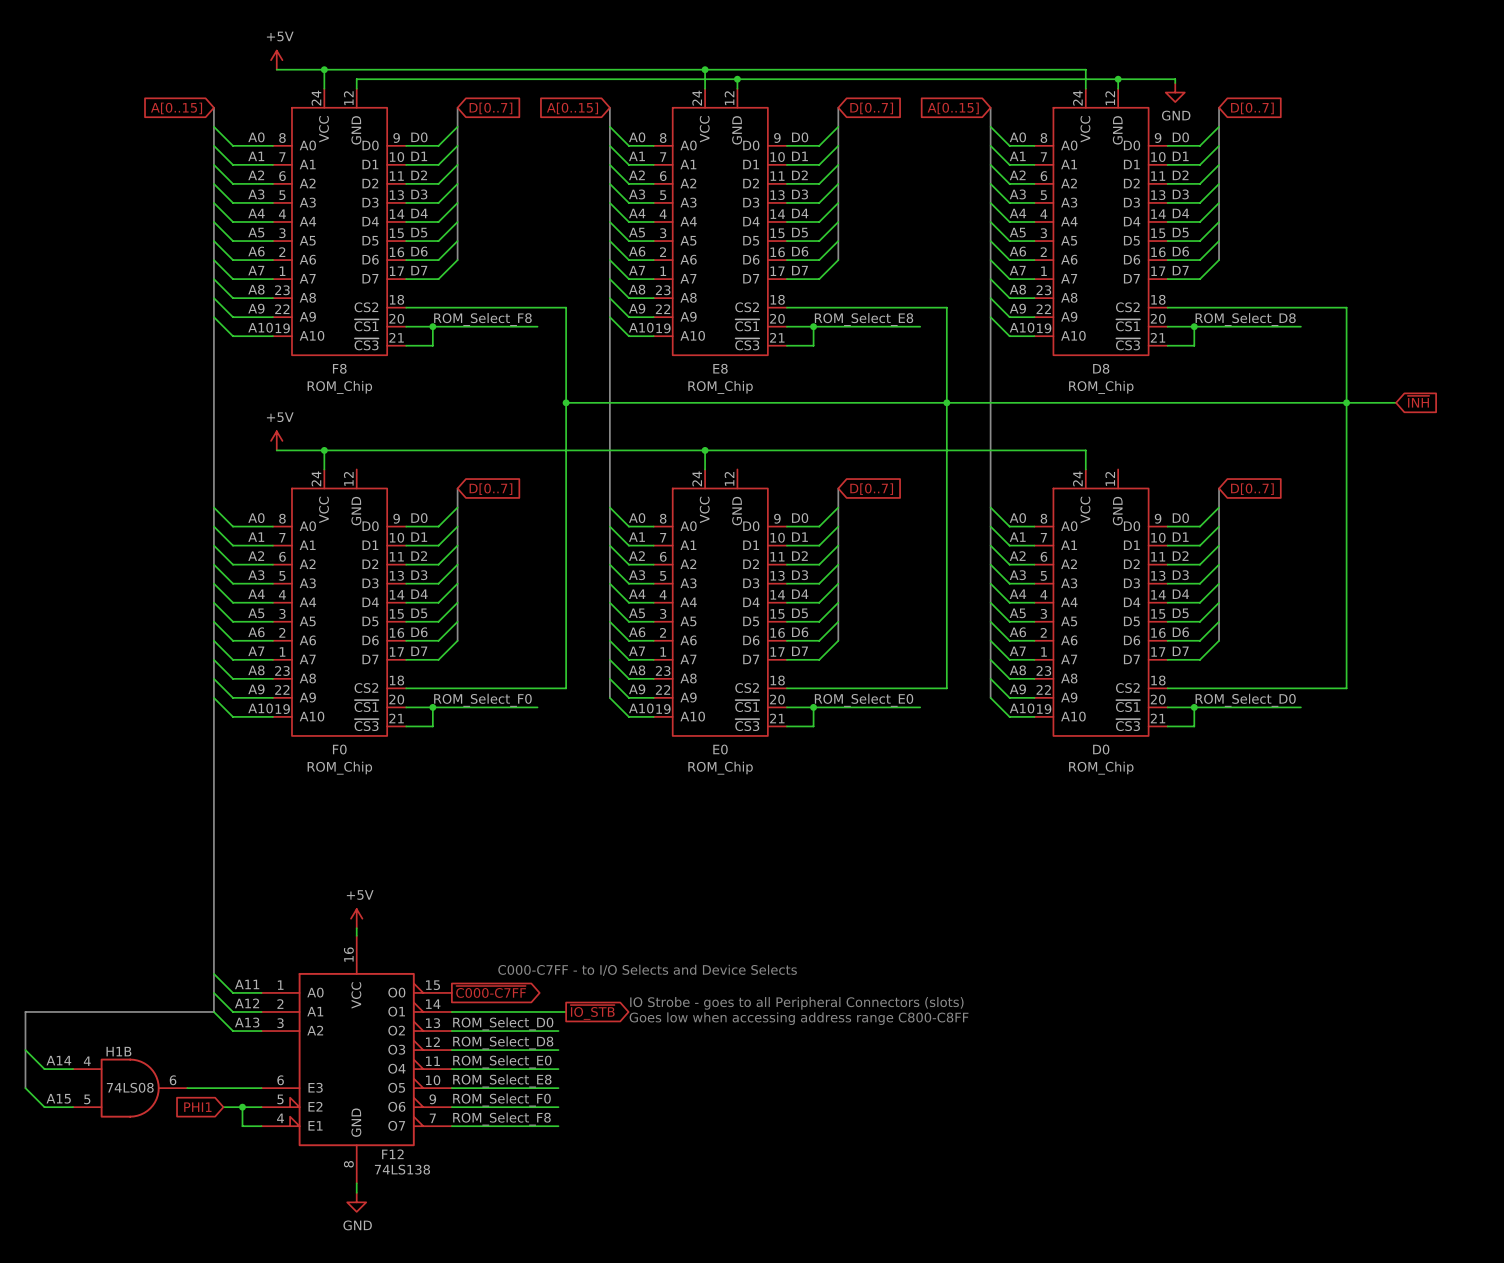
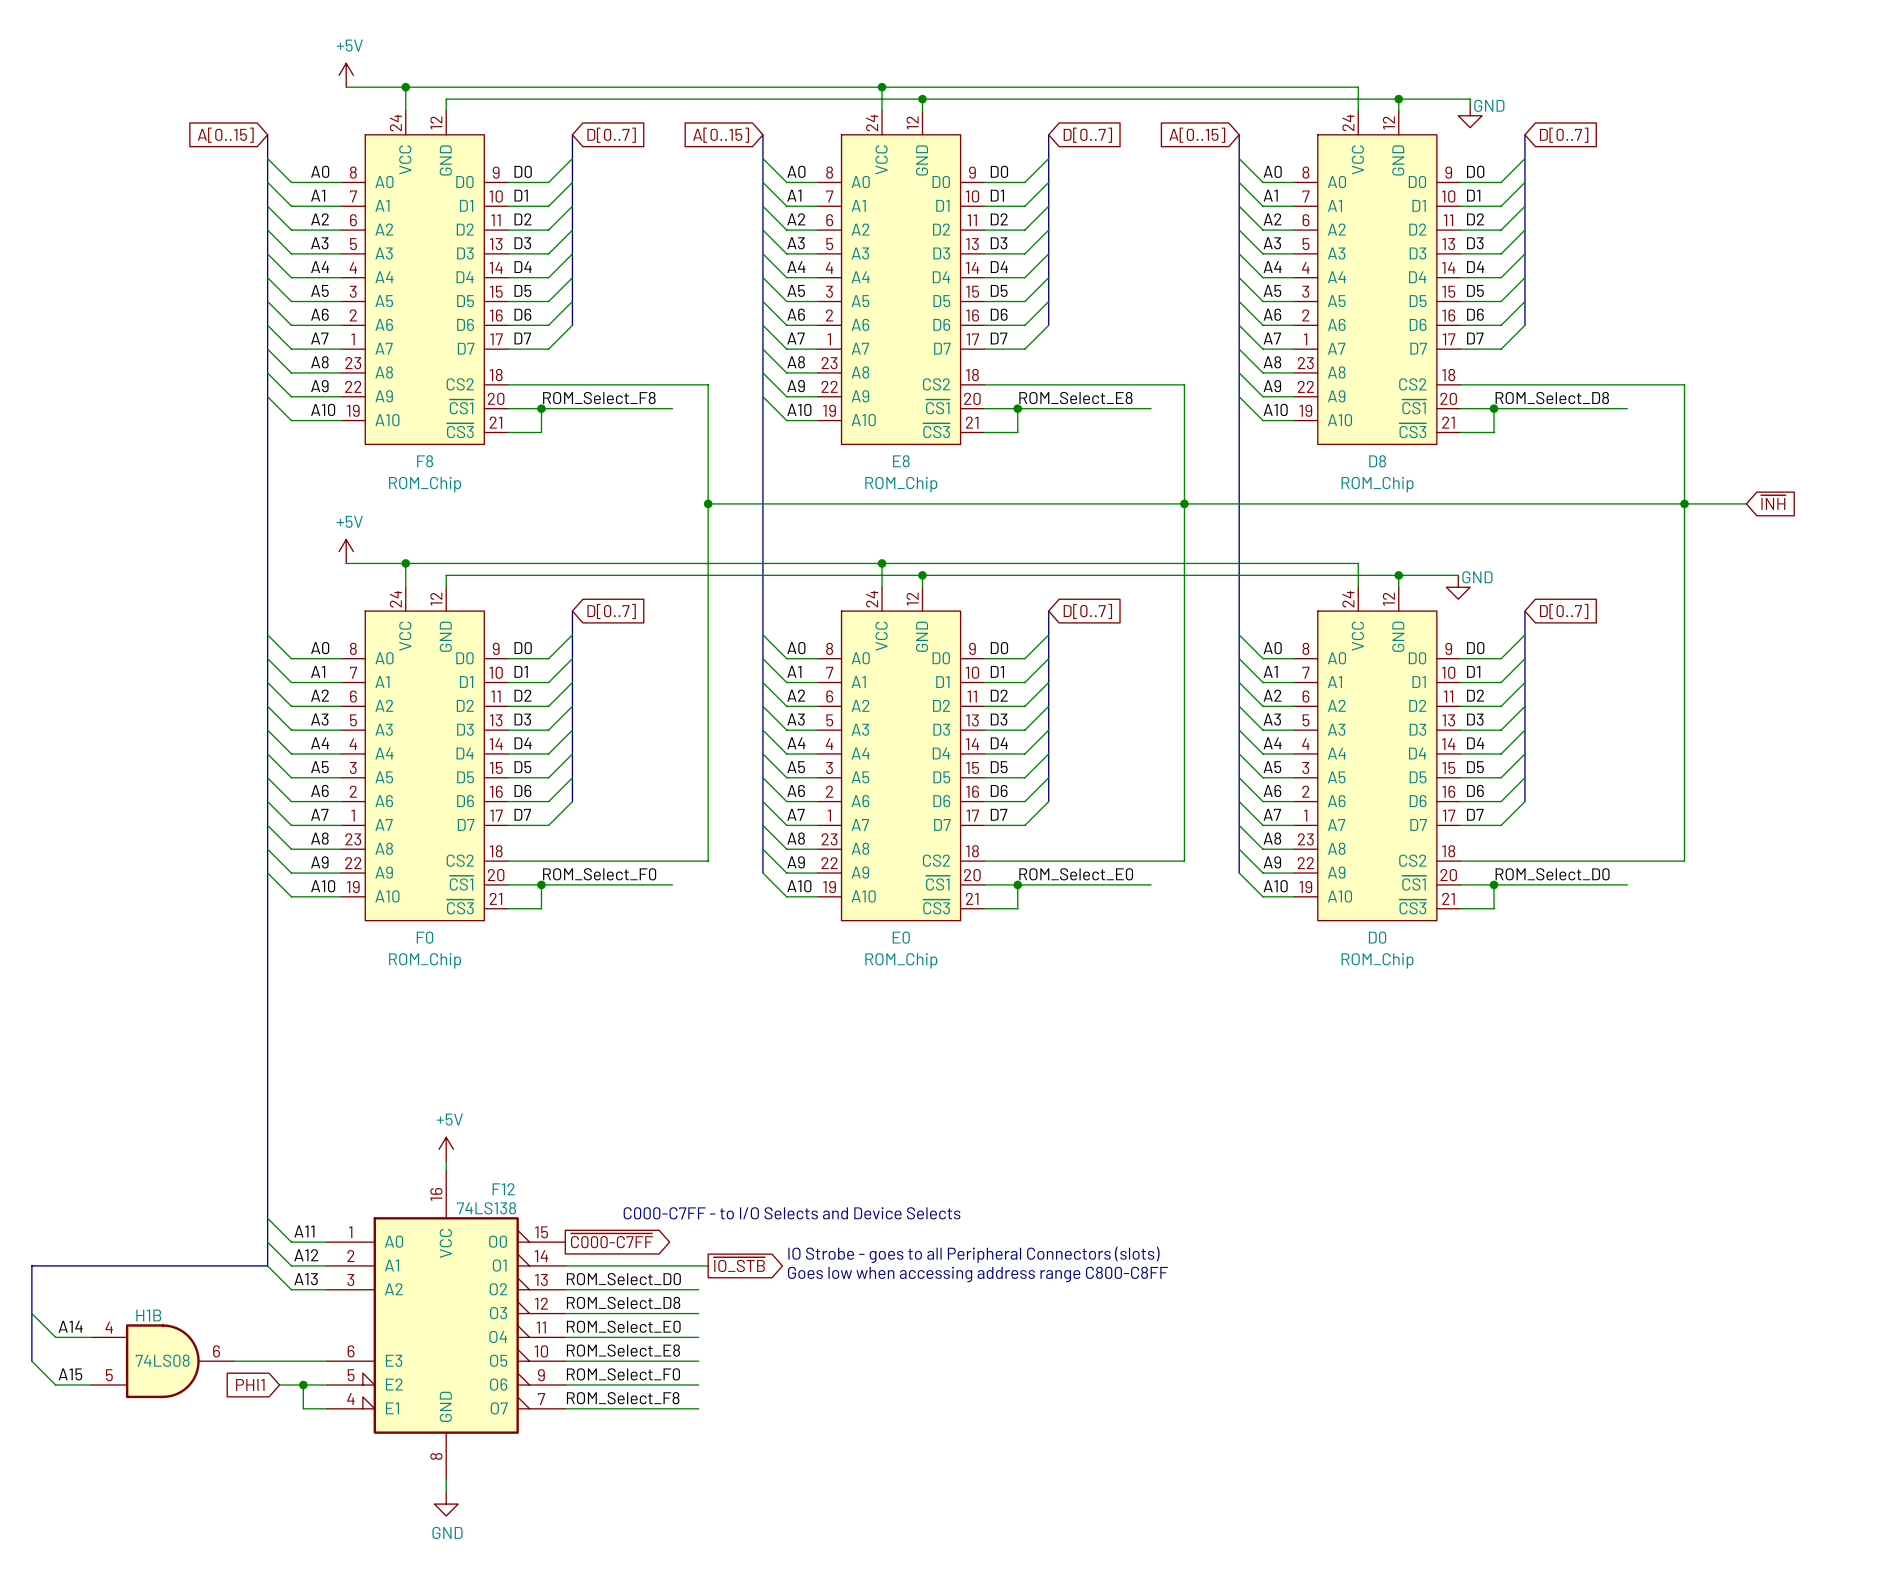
power symbol text position: GND (1176, 115) -> GND (1489, 105)
wire: none -> (922, 575) (922, 587)
junction: none -> (922, 575)
wire: none -> (1398, 575) (1398, 587)
junction: none -> (1398, 575)
wire: none -> (1458, 575) (446, 575) (446, 587)
power symbol: none -> GND (1458, 587)
F12 name position: F12 (392, 1154) -> F12 (503, 1189)
F12 value position: 74LS138 (402, 1169) -> 74LS138 (486, 1208)

